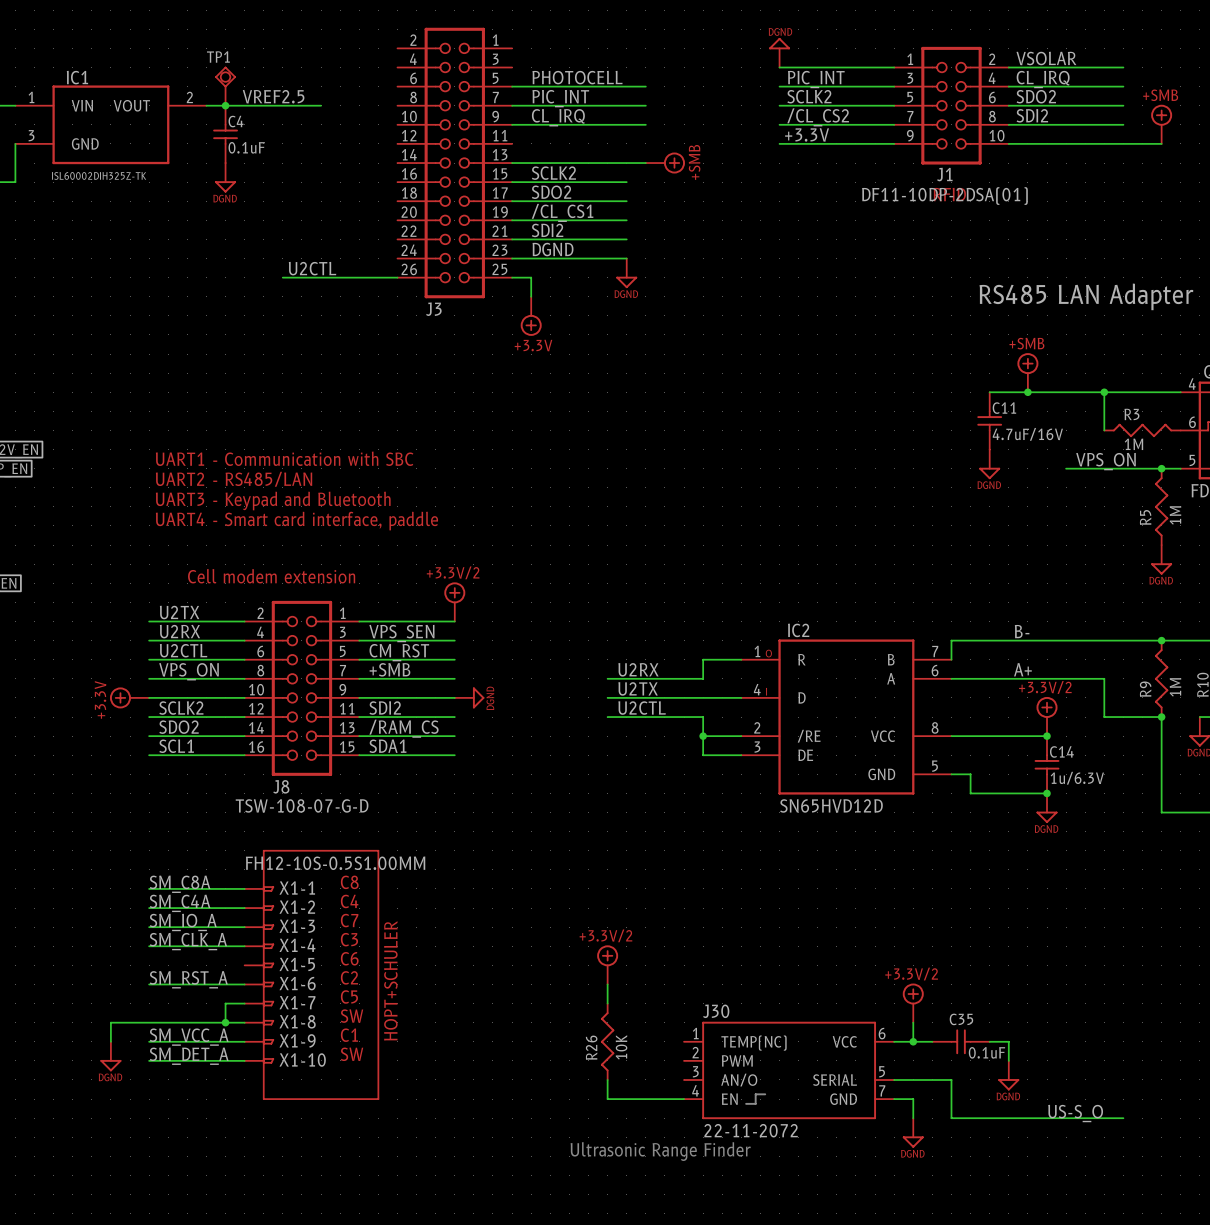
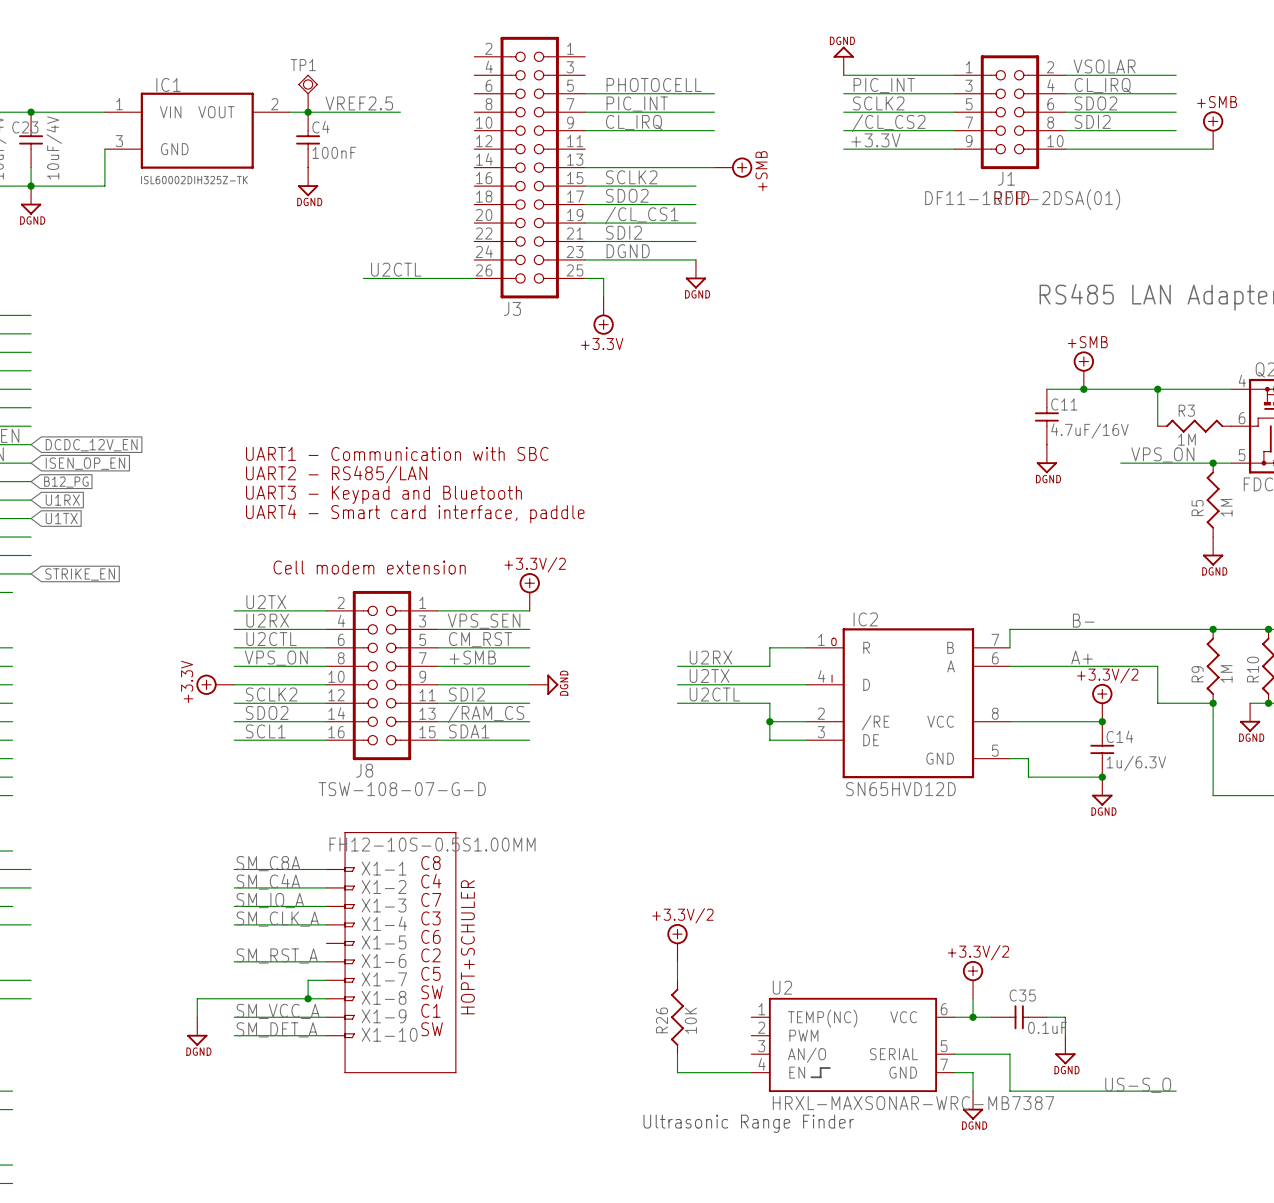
C4 value: 0.1uF (246, 147) -> 100nF (334, 152)
J30 name: J30 (716, 1011) -> U2 (782, 987)
J30 value: 22-11-2072 (751, 1130) -> HRXL-MAXSONAR-WRC-MB7387 (913, 1103)

